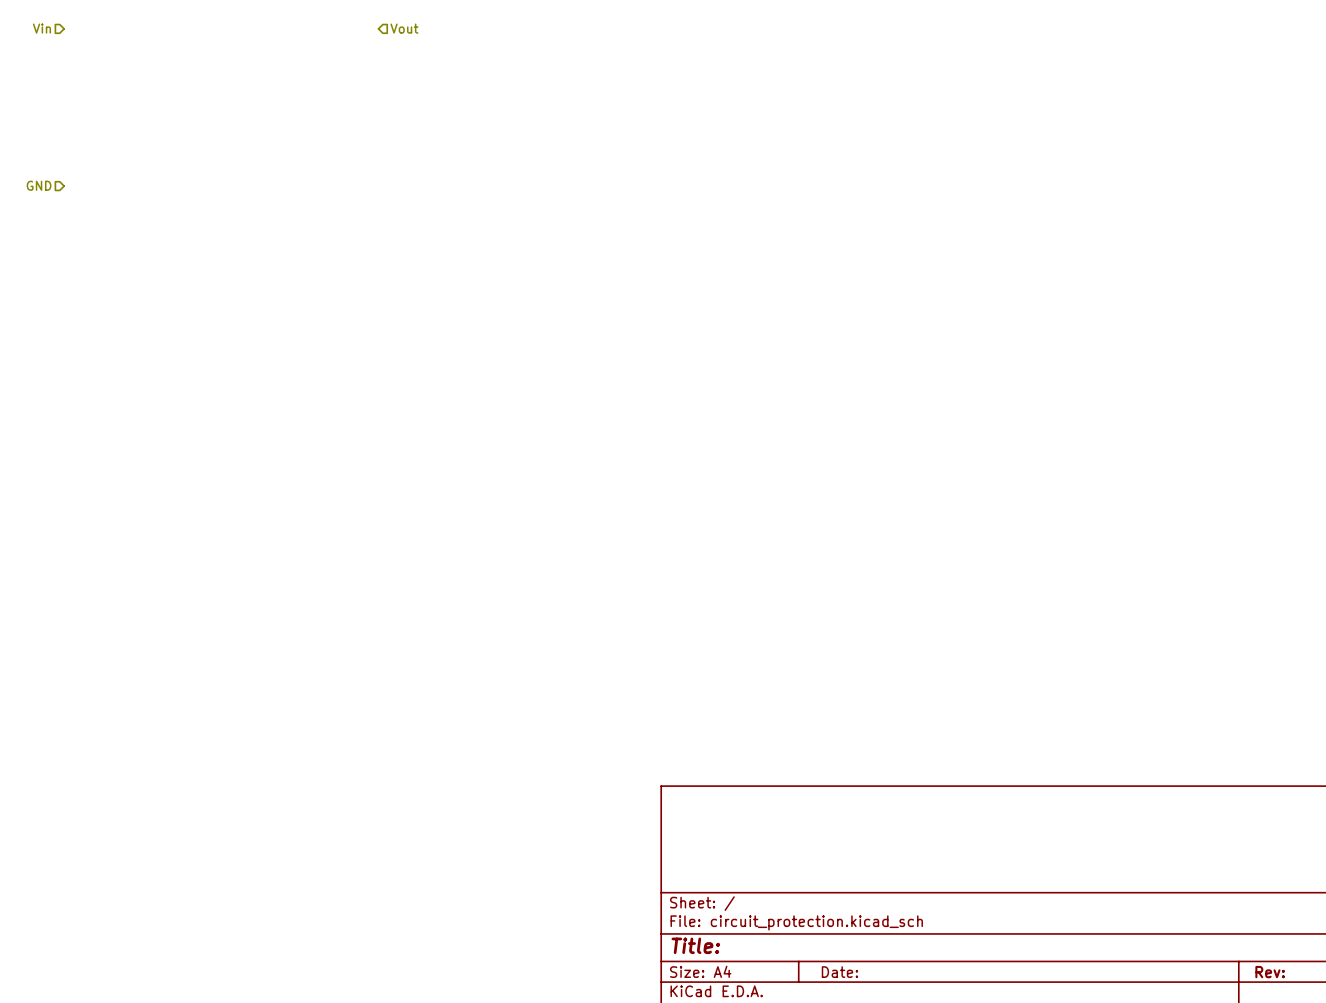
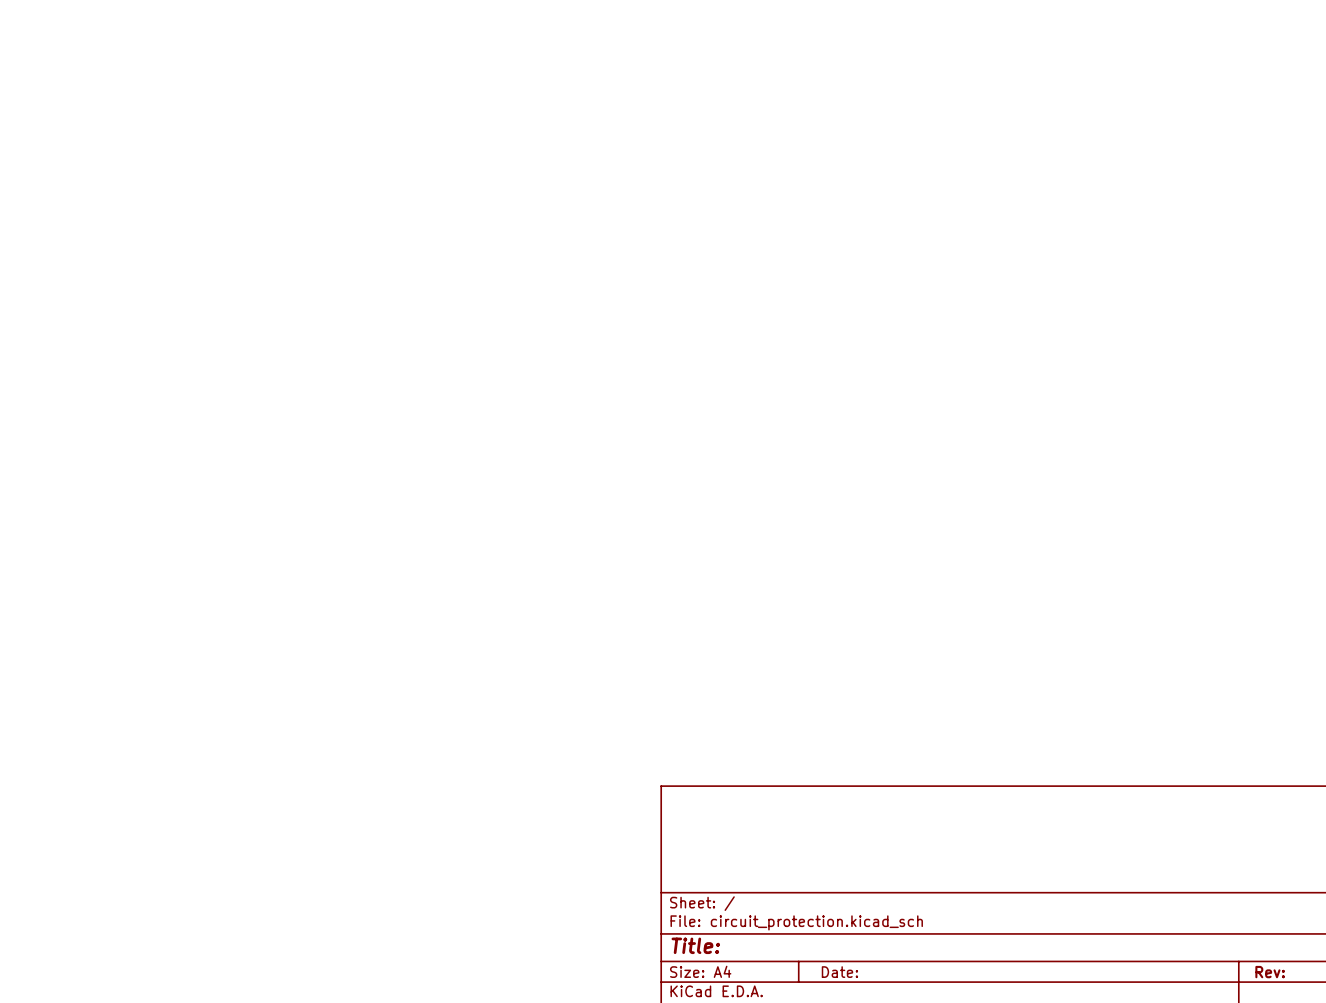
hierarchical label: Vin (41, 28) -> none
hierarchical label: Vout (404, 28) -> none
hierarchical label: GND (39, 185) -> none

